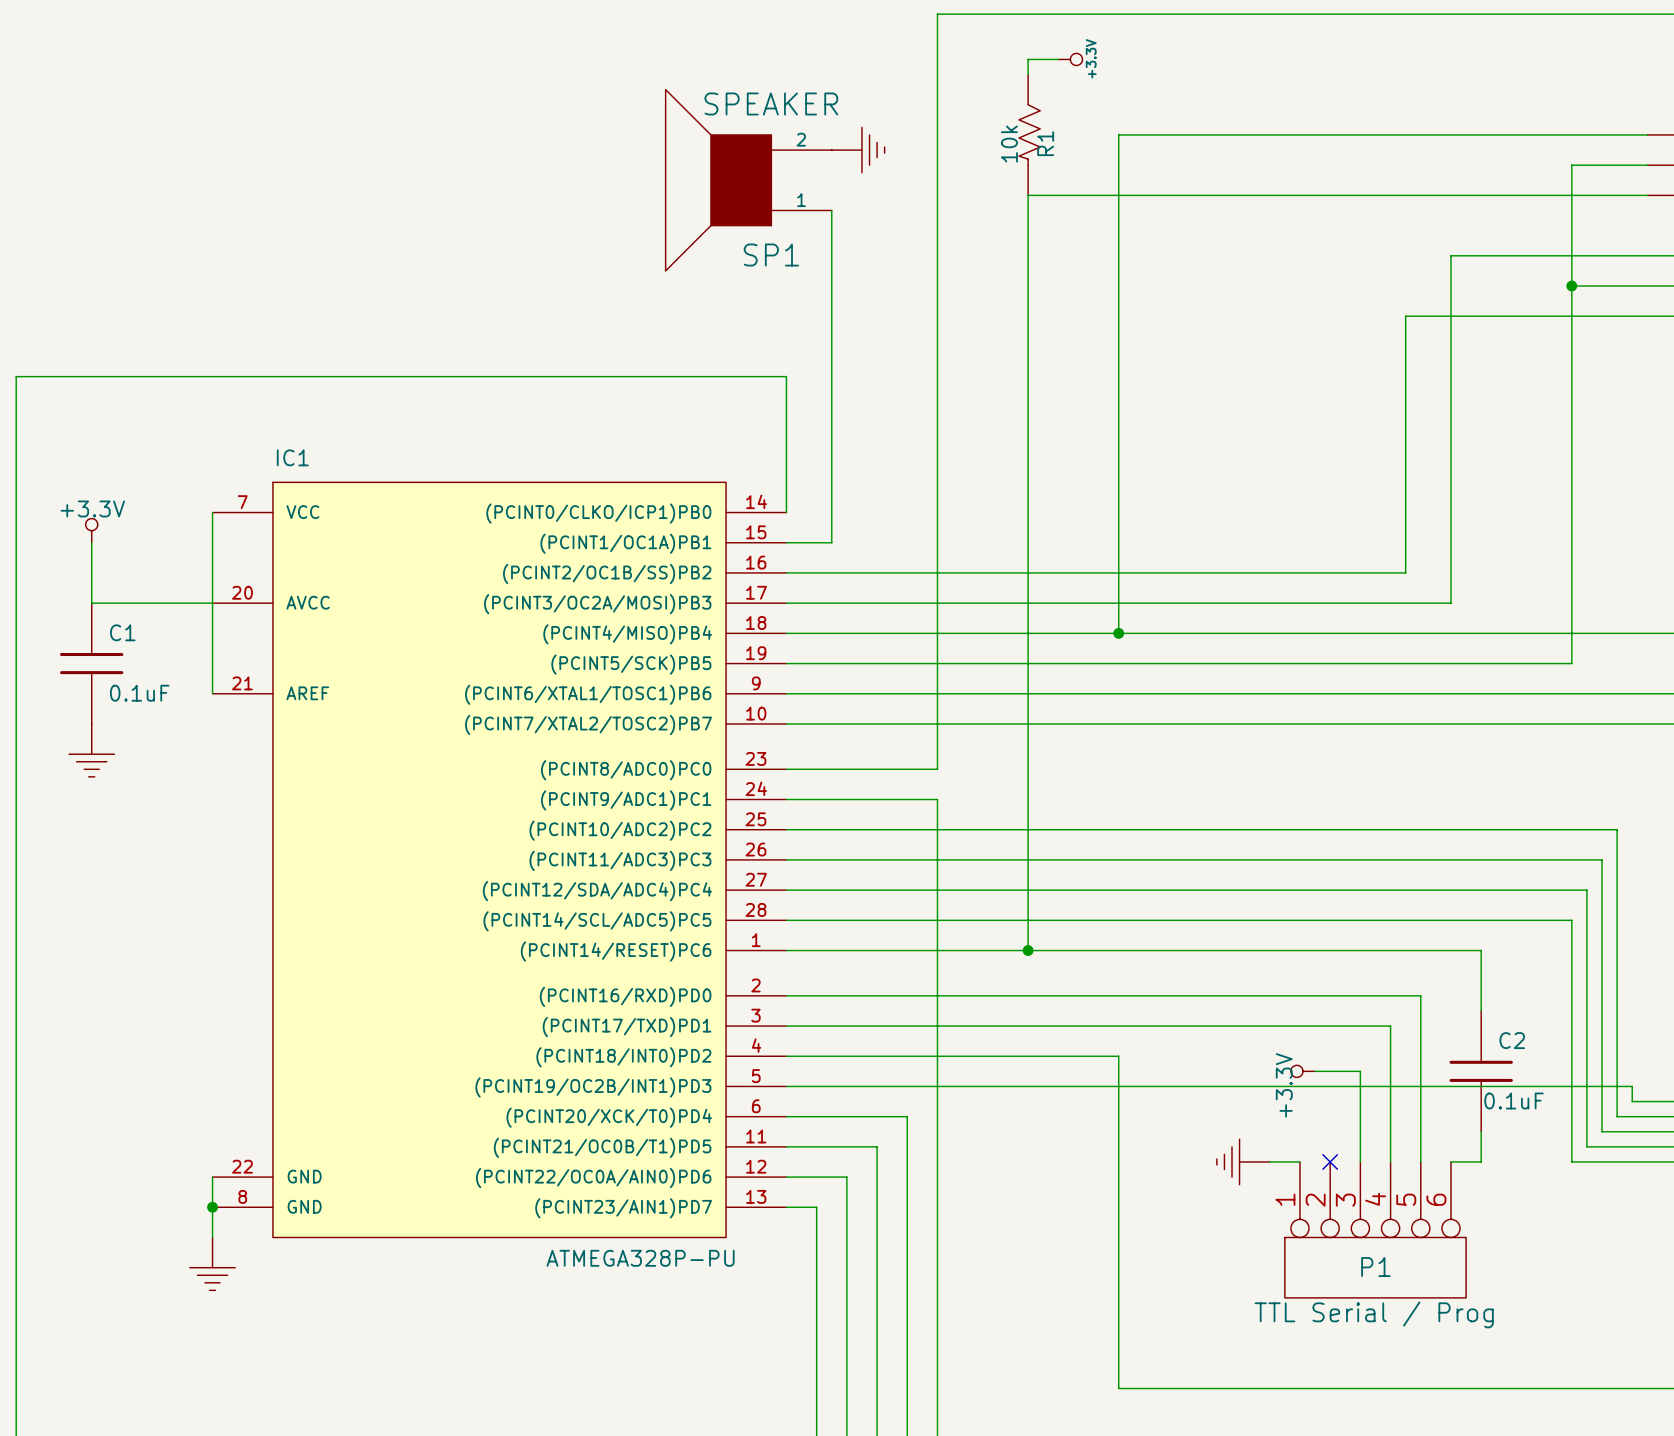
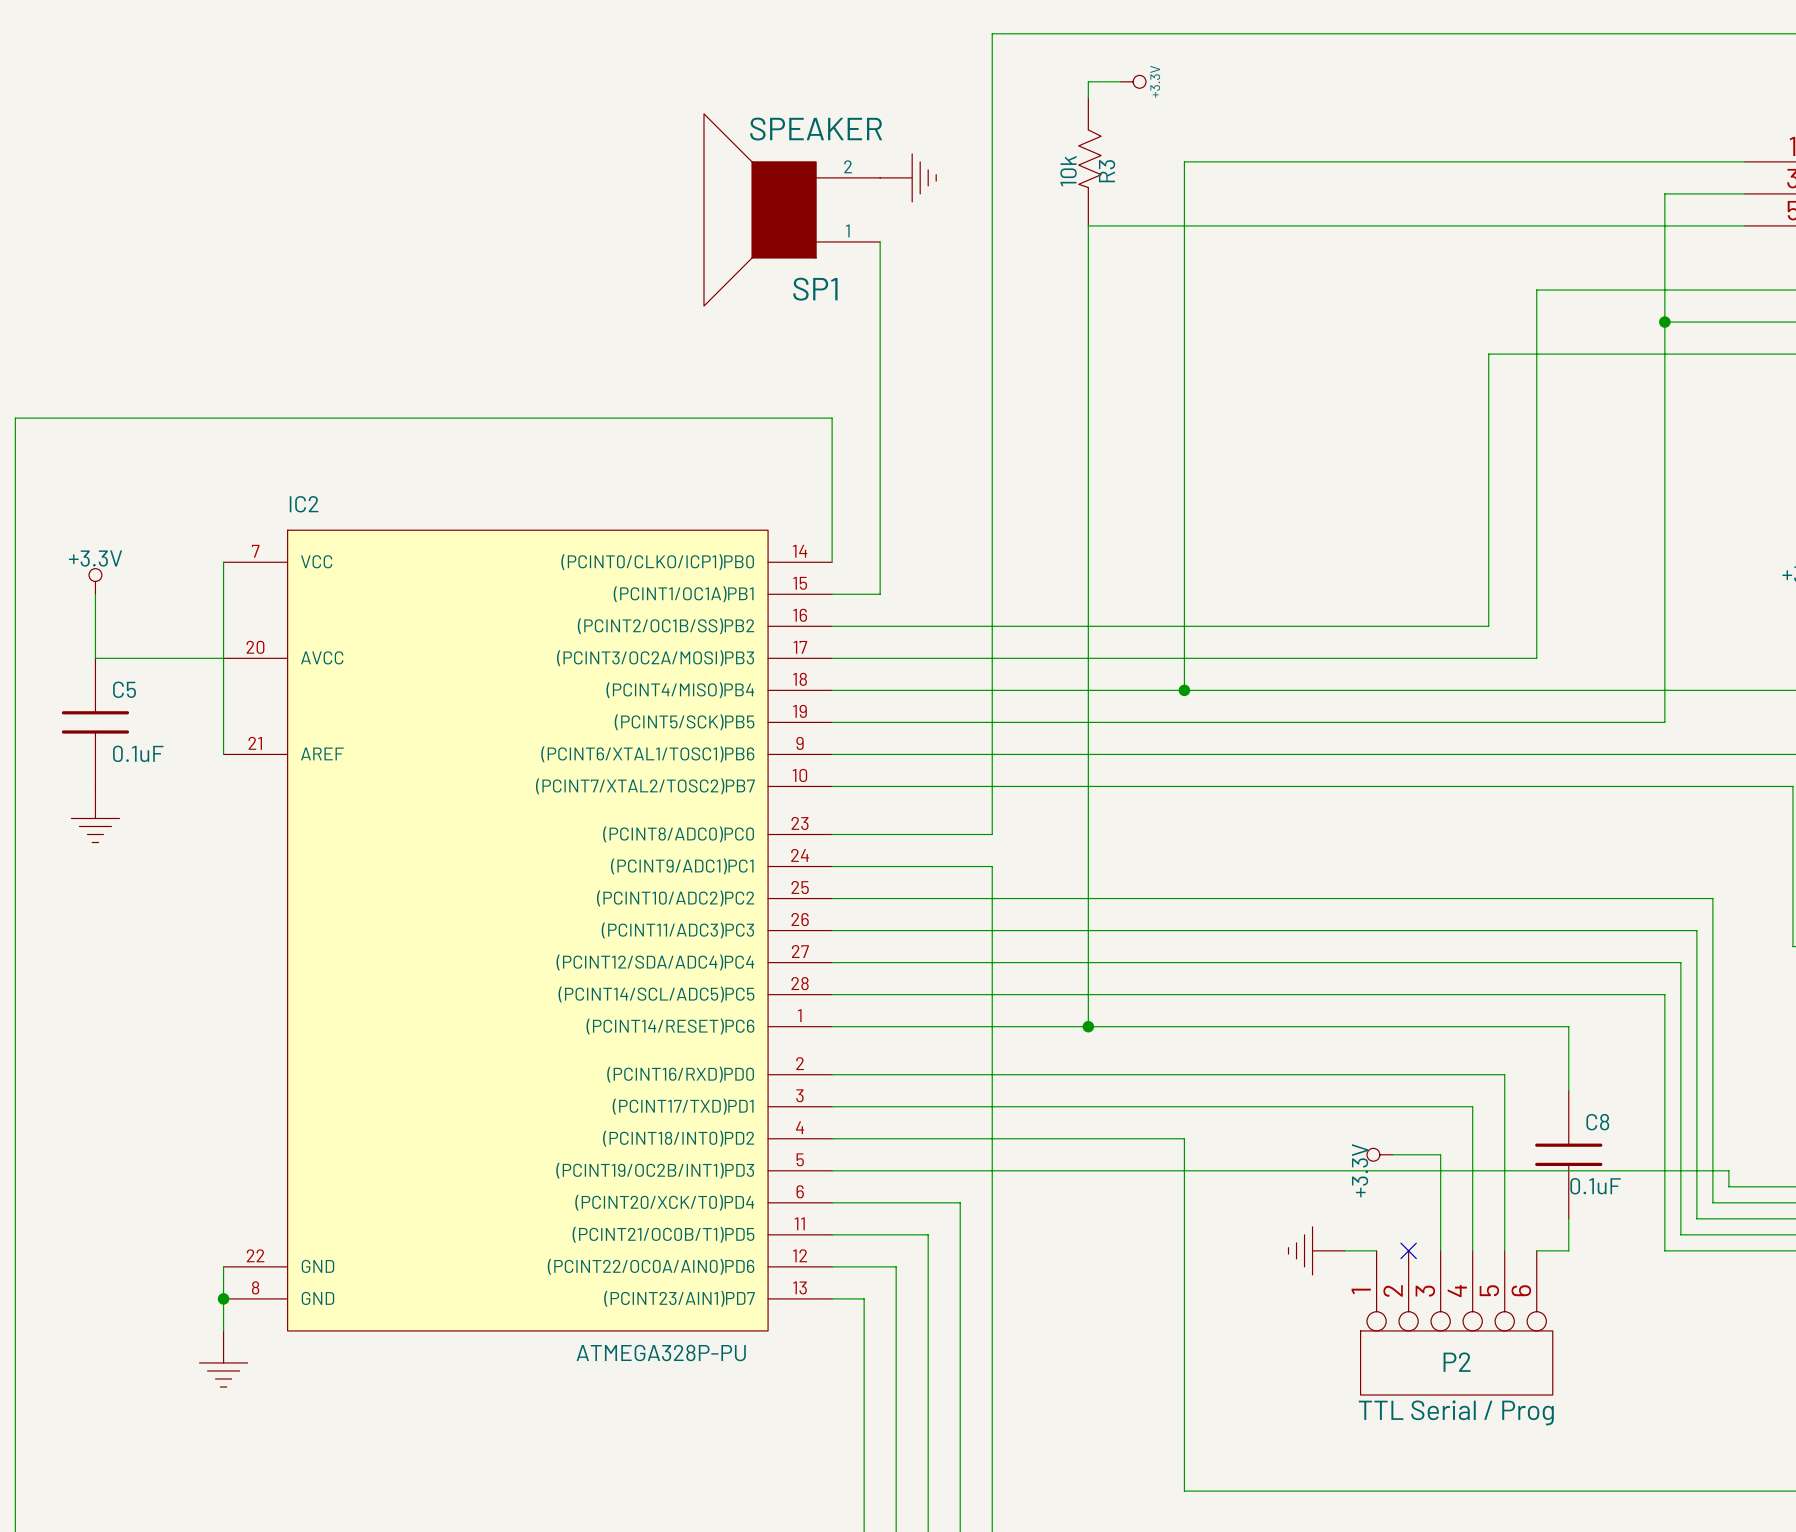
R1 name: R1 (1045, 143) -> R3 (1107, 171)
IC1 name: IC1 (292, 457) -> IC2 (304, 504)
C1 name: C1 (122, 632) -> C5 (124, 689)
C2 name: C2 (1512, 1040) -> C8 (1597, 1122)
P1 name: P1 (1375, 1267) -> P2 (1457, 1362)

